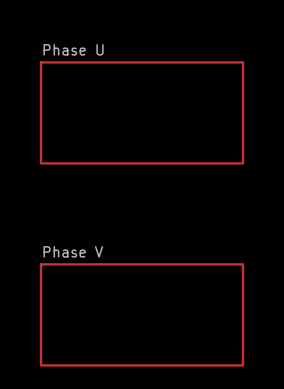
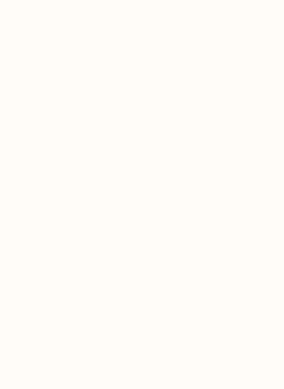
sheet Phase U: (142, 112) -> none
sheet Phase V: (142, 314) -> none

